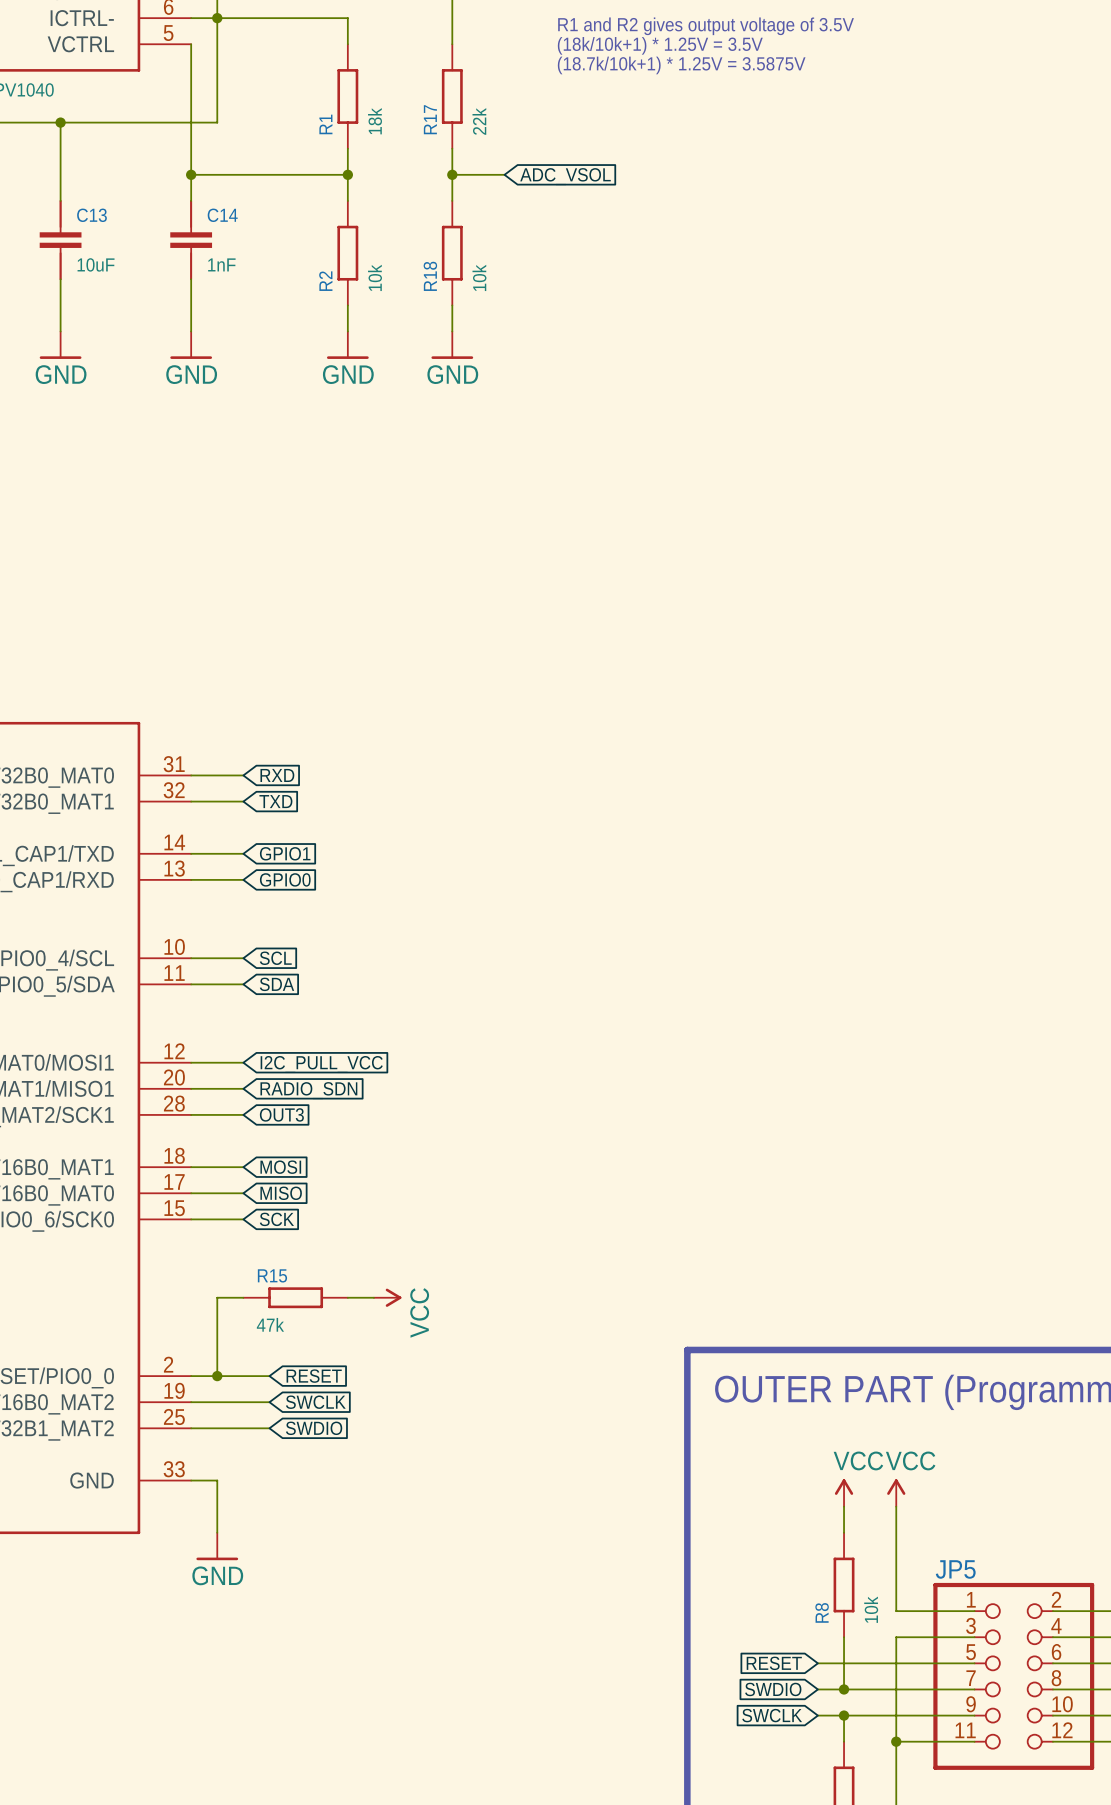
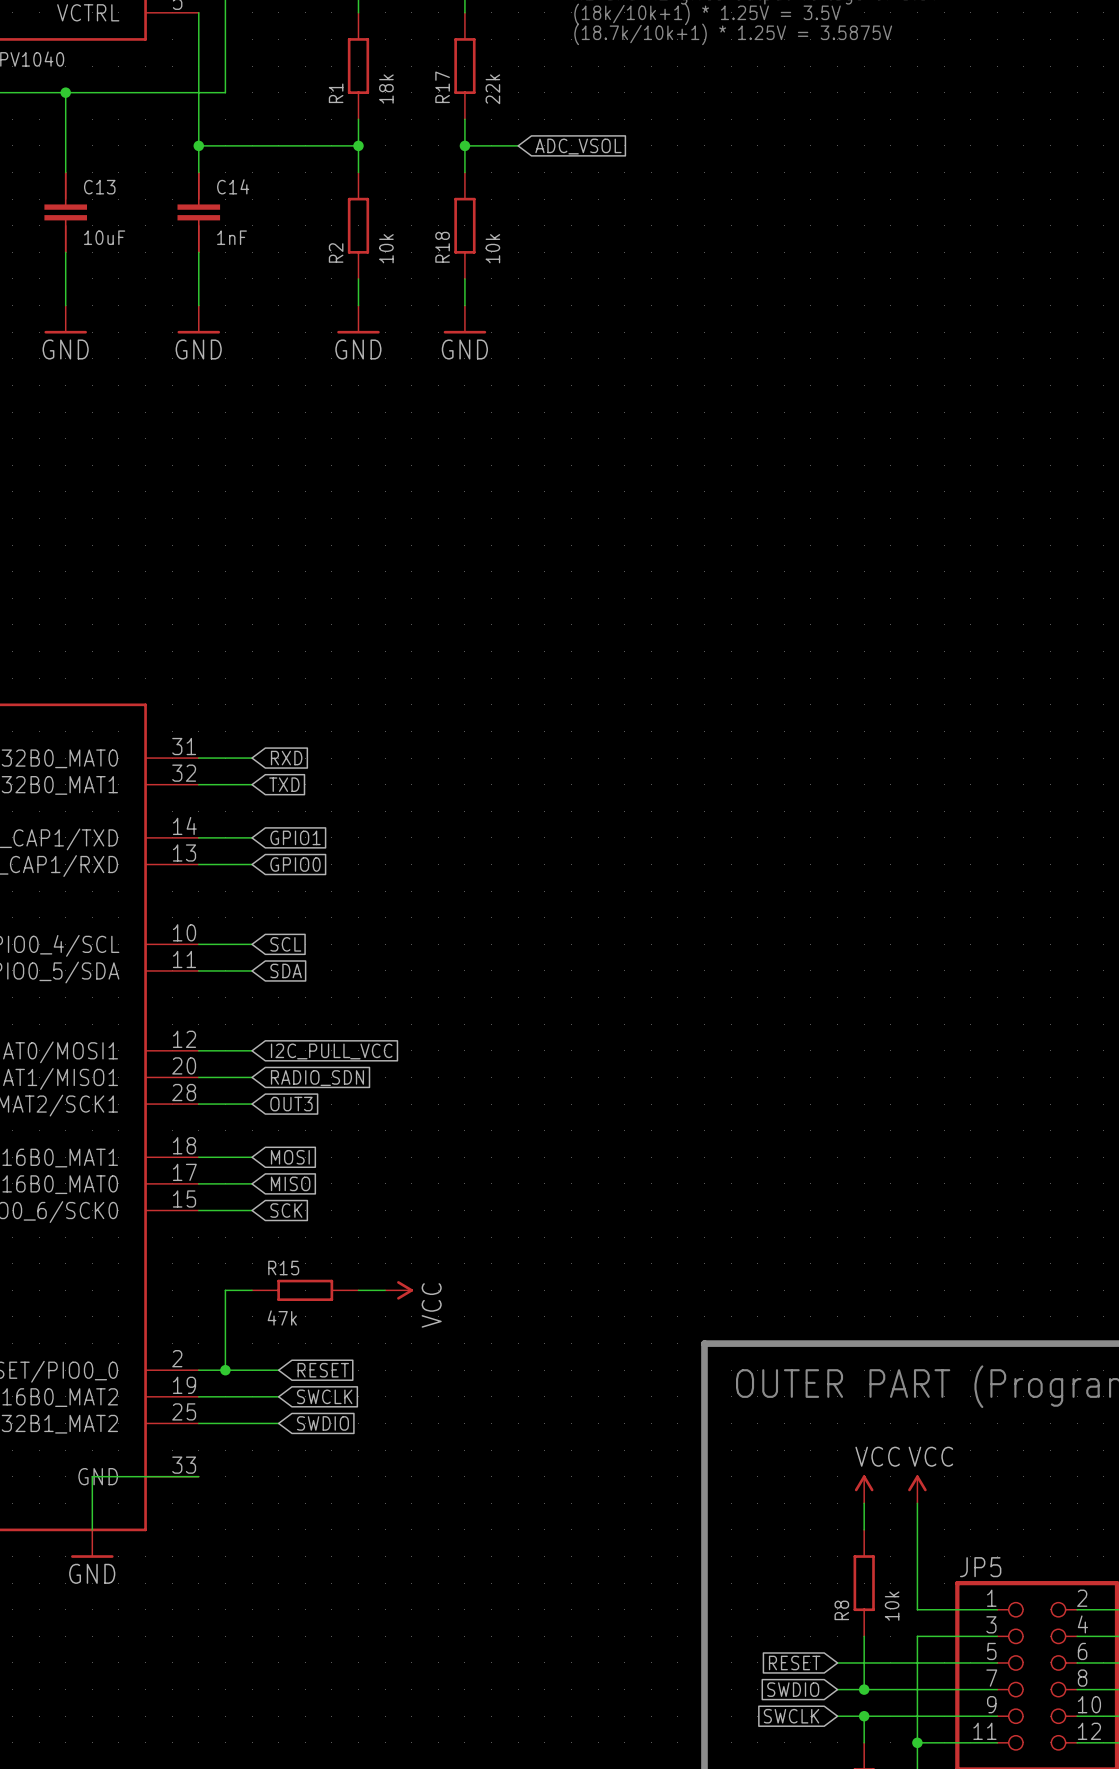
wire: (191, 1480) (217, 1480) (217, 1532) -> (198, 1476) (92, 1476) (92, 1529)
power symbol position: GND (217, 1546) -> GND (92, 1543)

